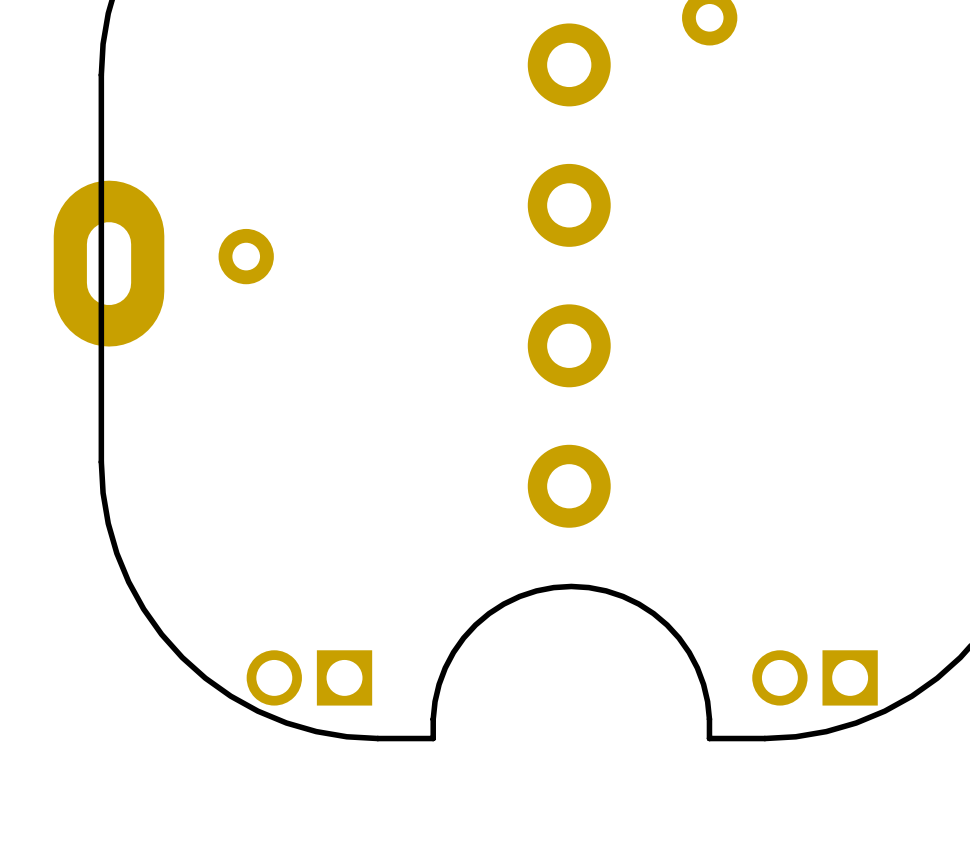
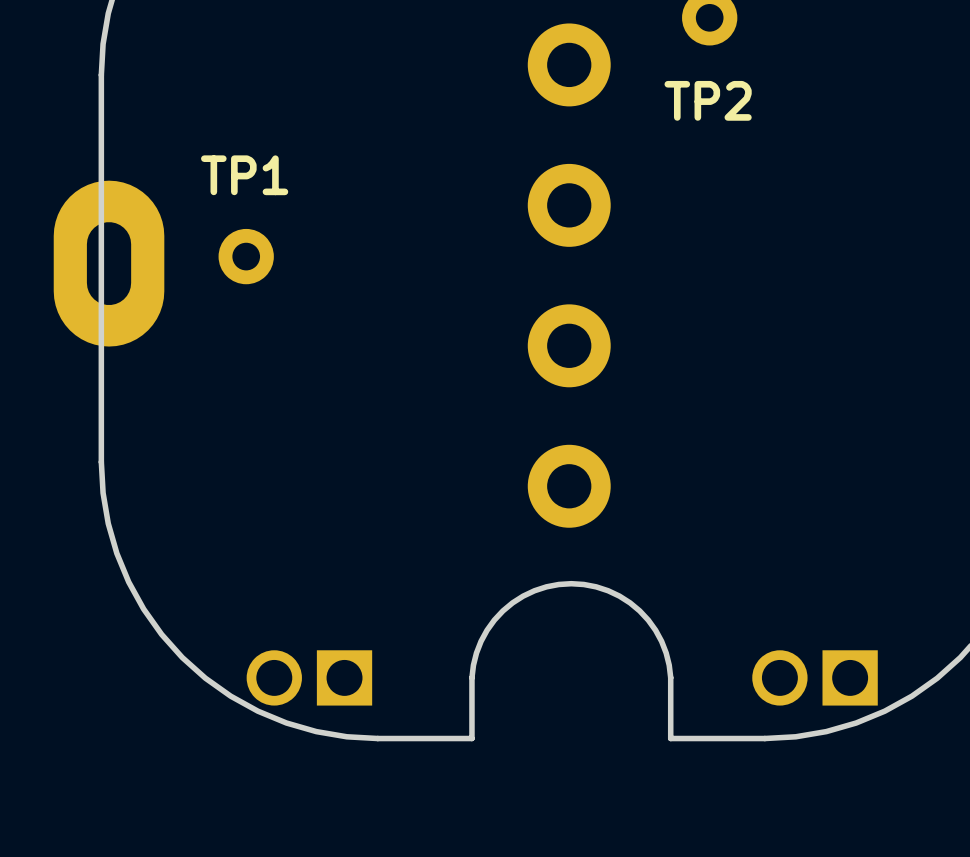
TP2 name: none -> TP2 (708, 100)
TP1 name: none -> TP1 (244, 175)
board edge: (709, 738) (707, 701) (703, 684) (697, 667) (679, 638) (653, 613) (638, 604) (606, 590) (571, 586) (553, 587) (519, 596) (489, 613) (463, 638) (445, 667) (439, 684) (435, 701) (433, 738) -> (709, 738) (670, 738) (669, 665) (661, 641) (648, 620) (630, 602) (608, 590) (583, 584) (571, 583) (546, 586) (523, 596) (502, 610) (494, 620) (481, 641) (473, 665) (471, 738) (433, 738)

